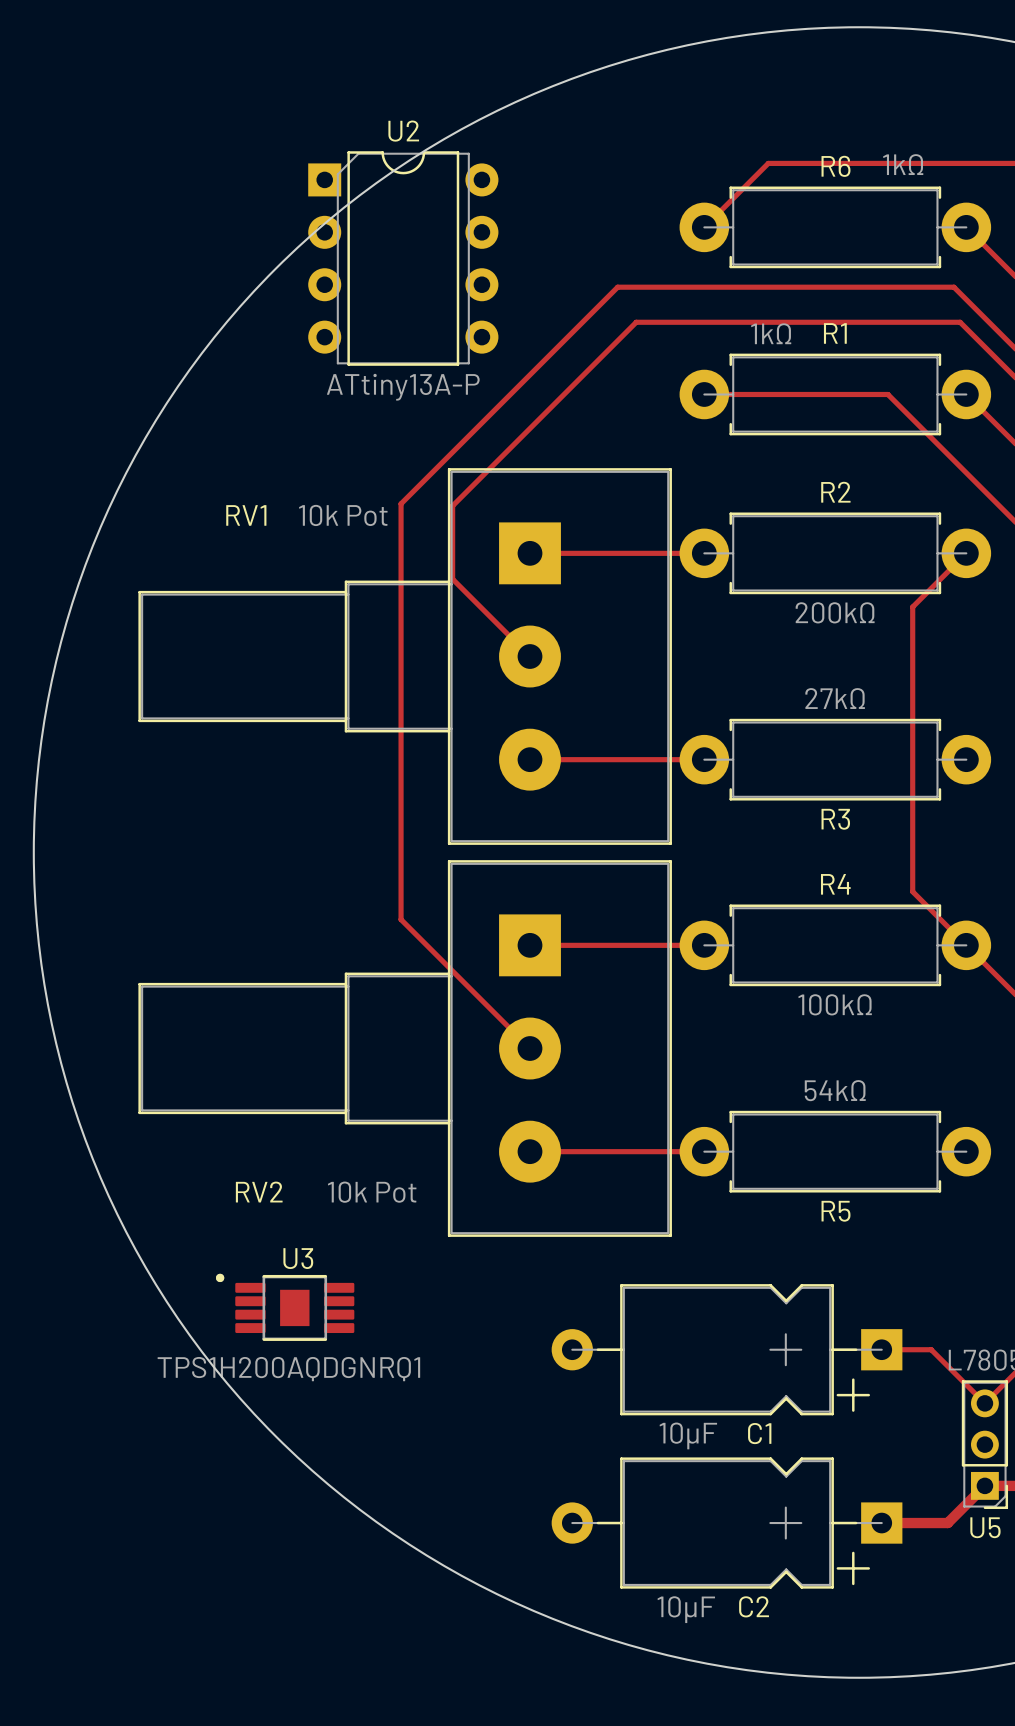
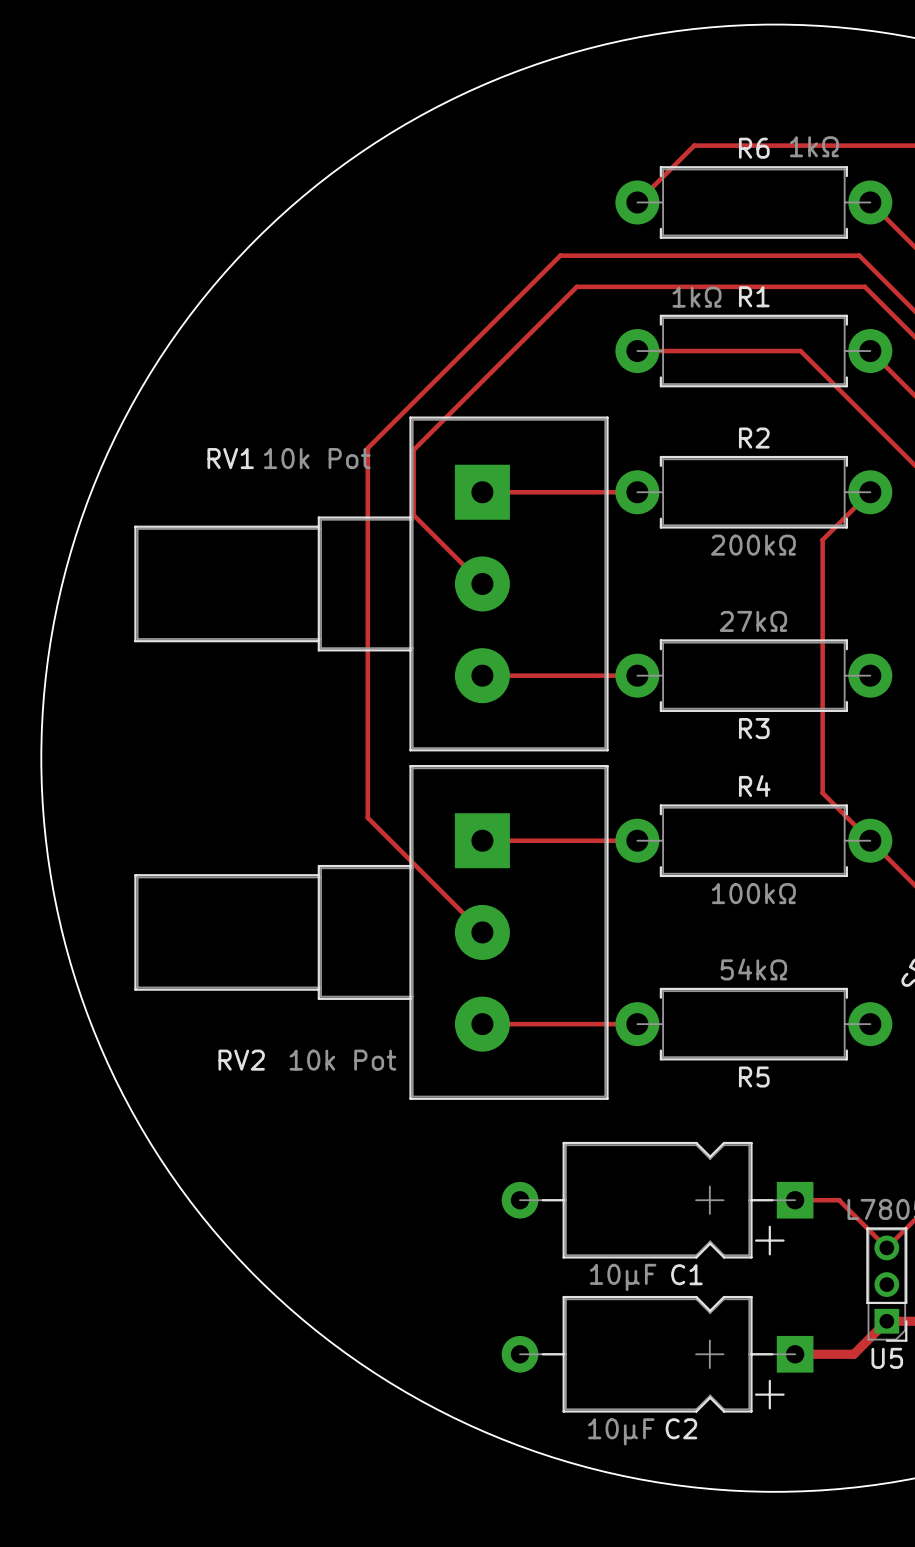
U2: ATtiny13A-P (403, 258) -> none
U3: TPS1H200AQDGNRQ1 (285, 1307) -> none

